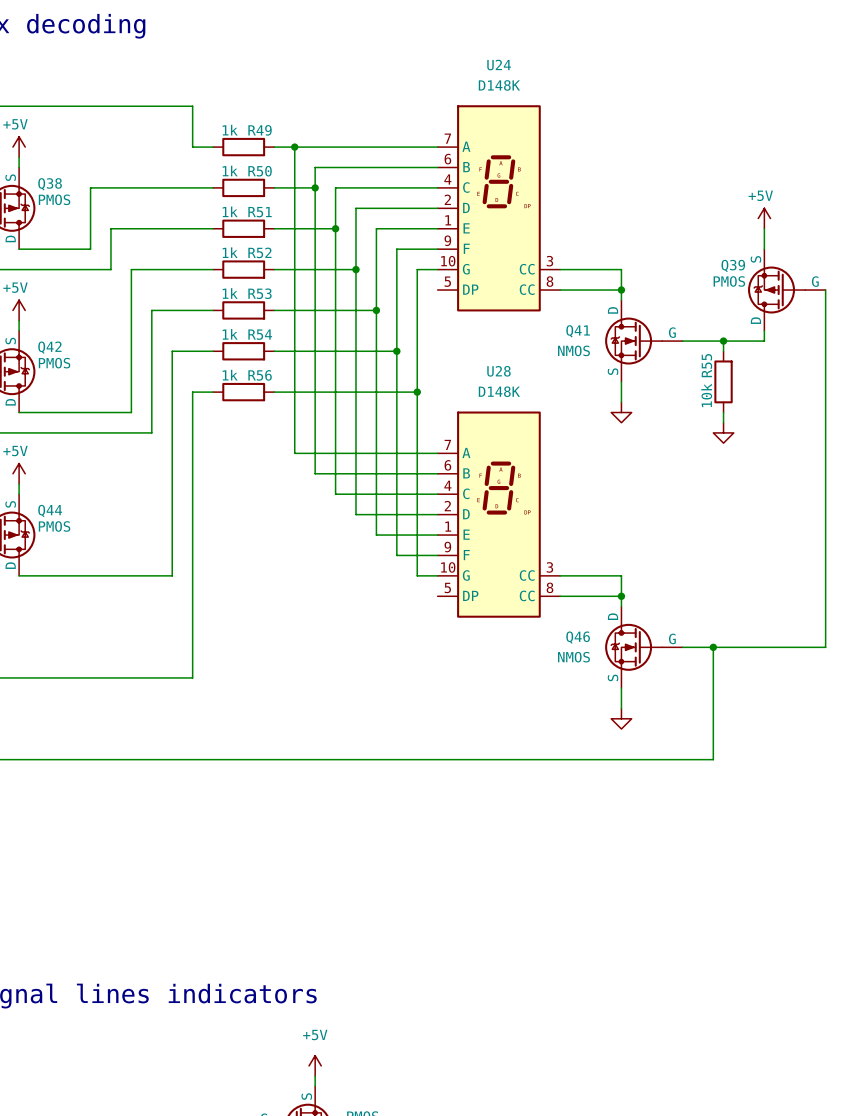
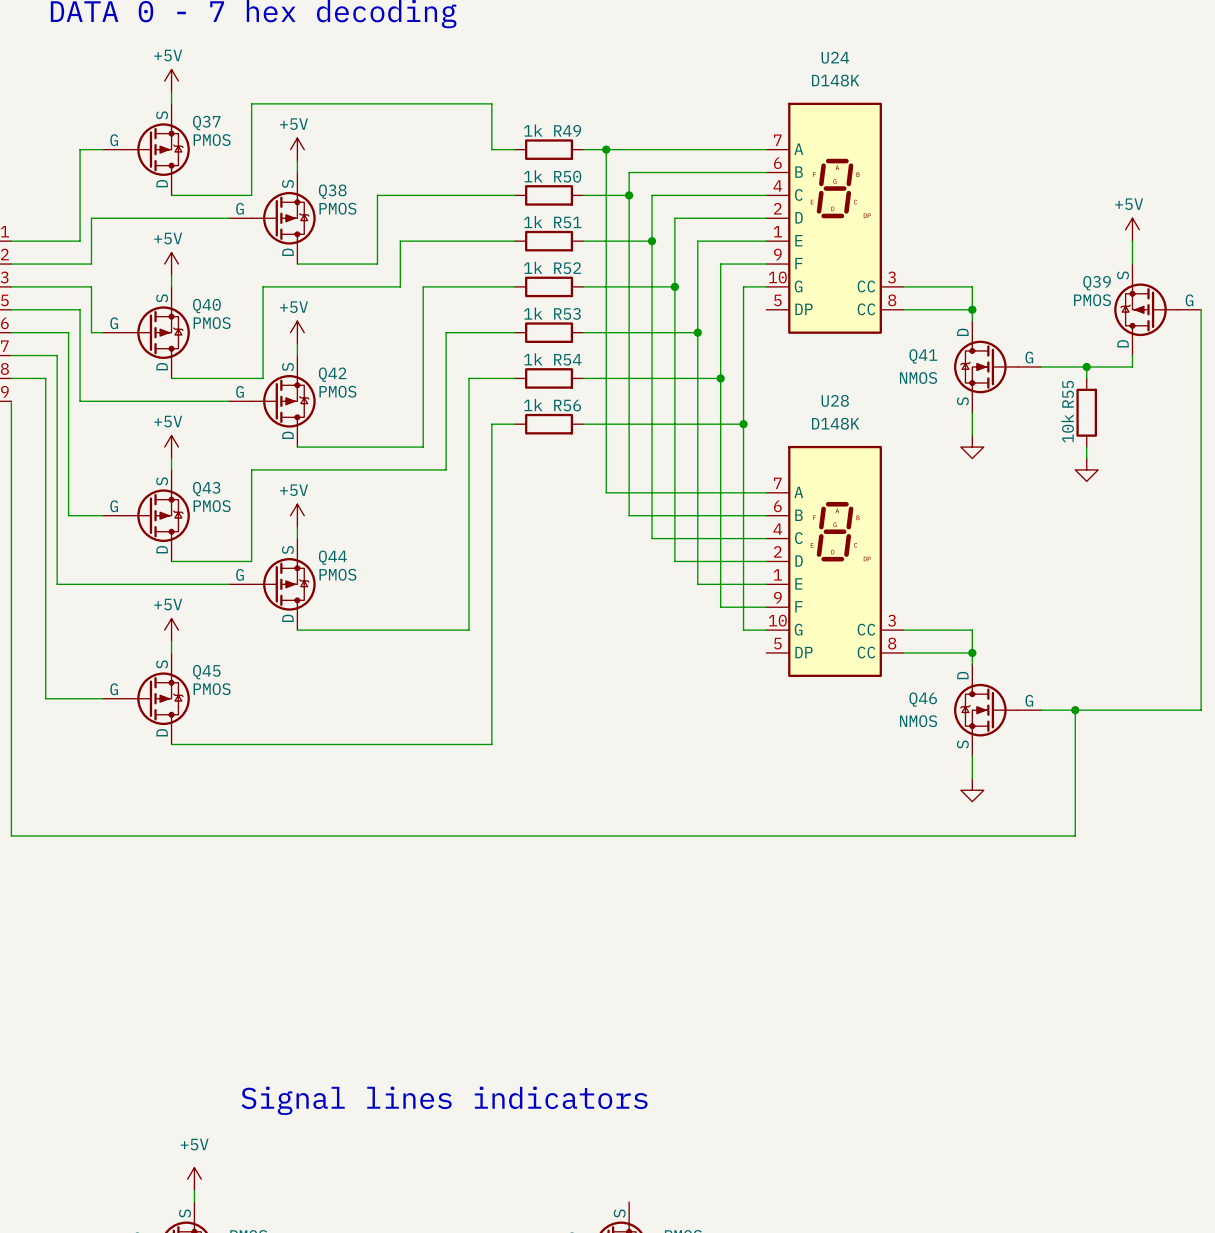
power symbol: +5V (315, 1065) -> none
wire: (315, 1076) (315, 1086) -> none

